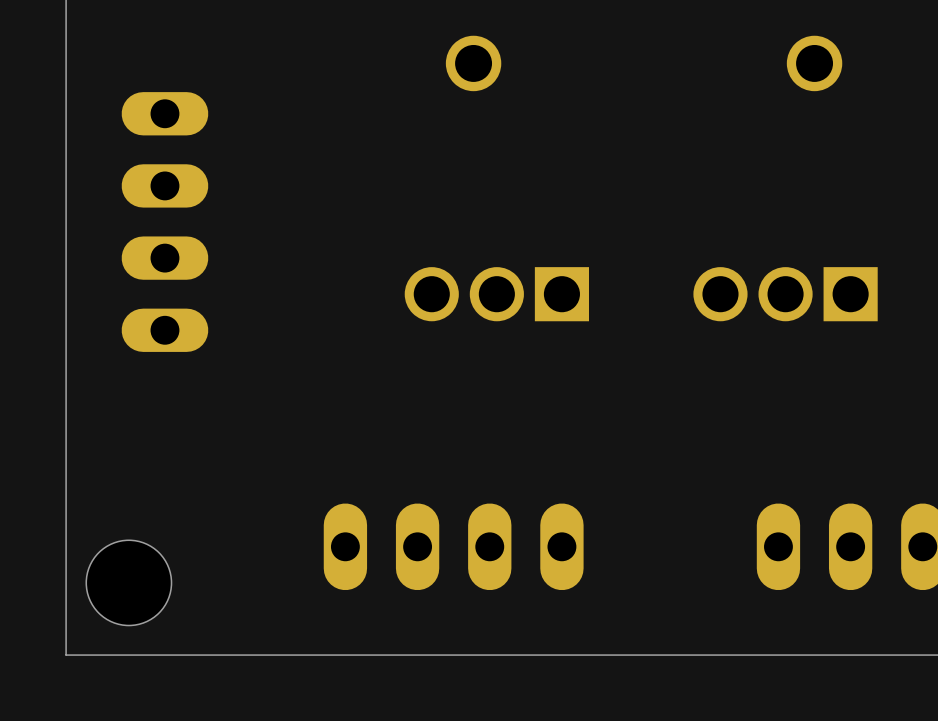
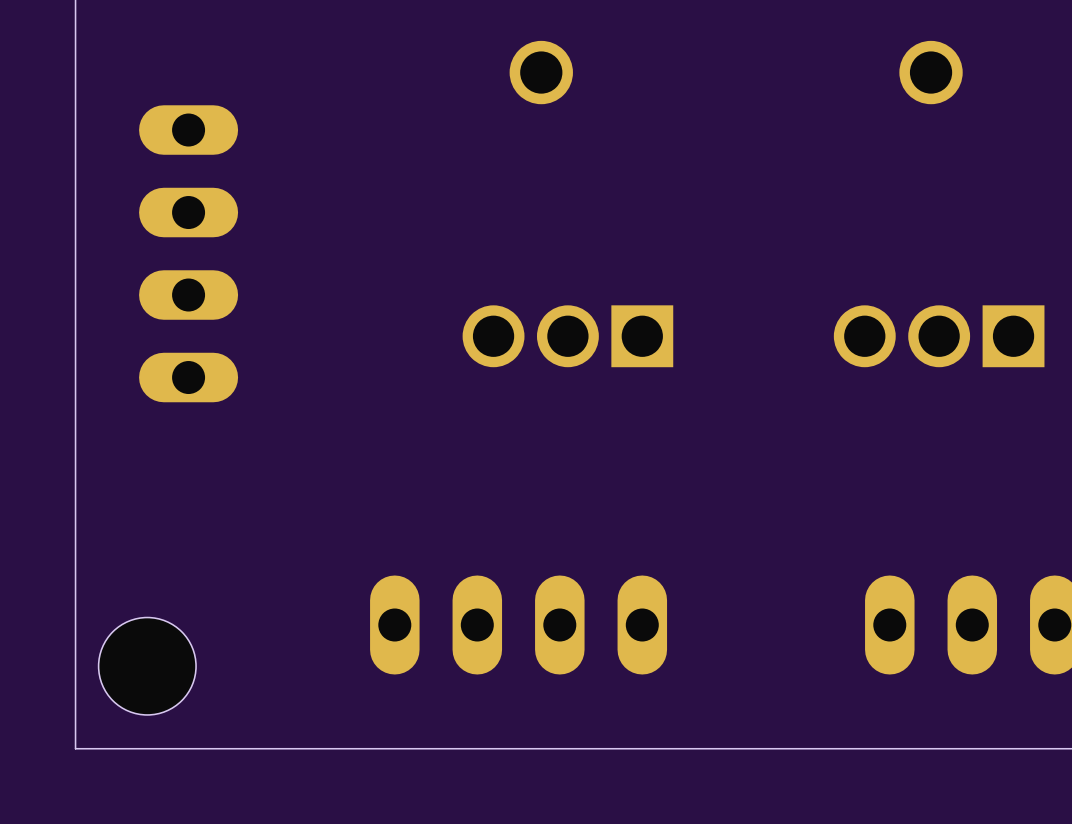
part position: (785, 294) -> (939, 336)

